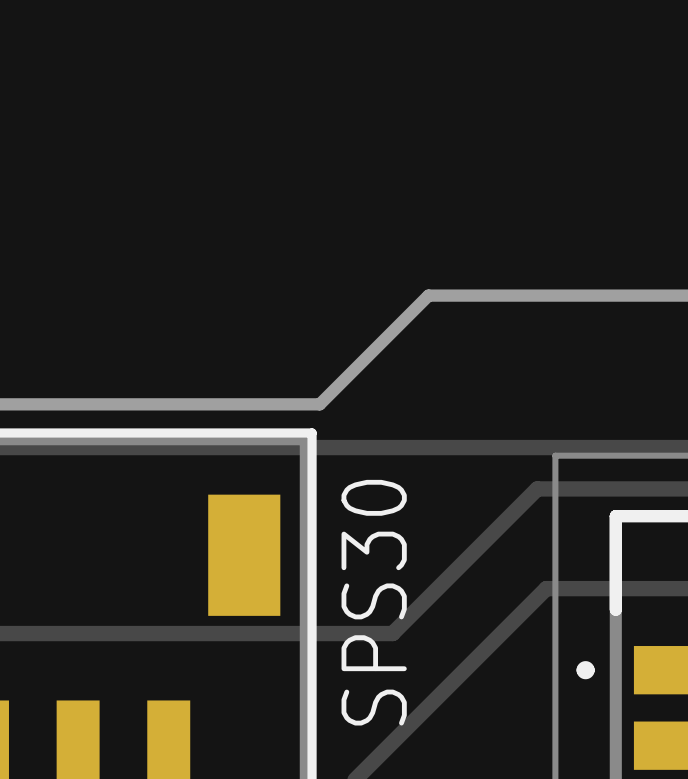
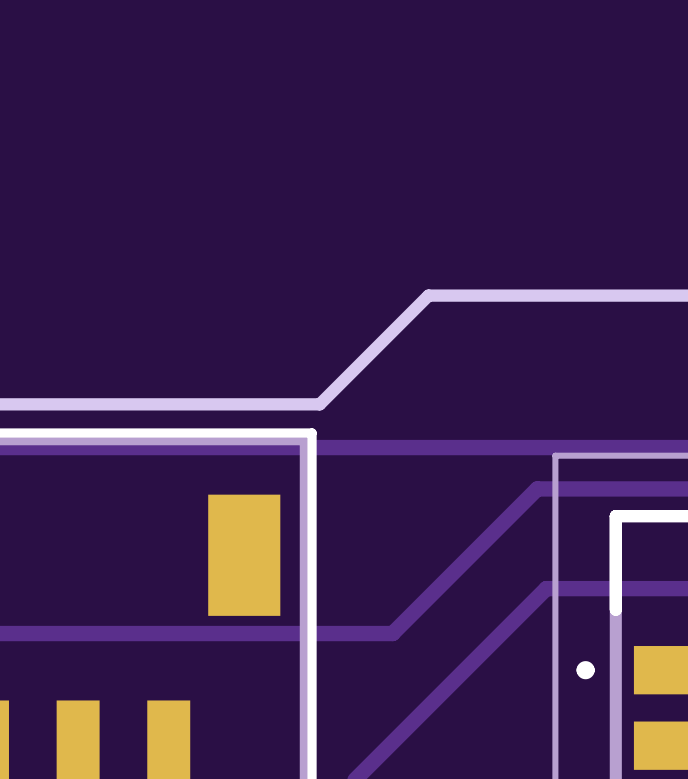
text: SPS30 (374, 602) -> none

